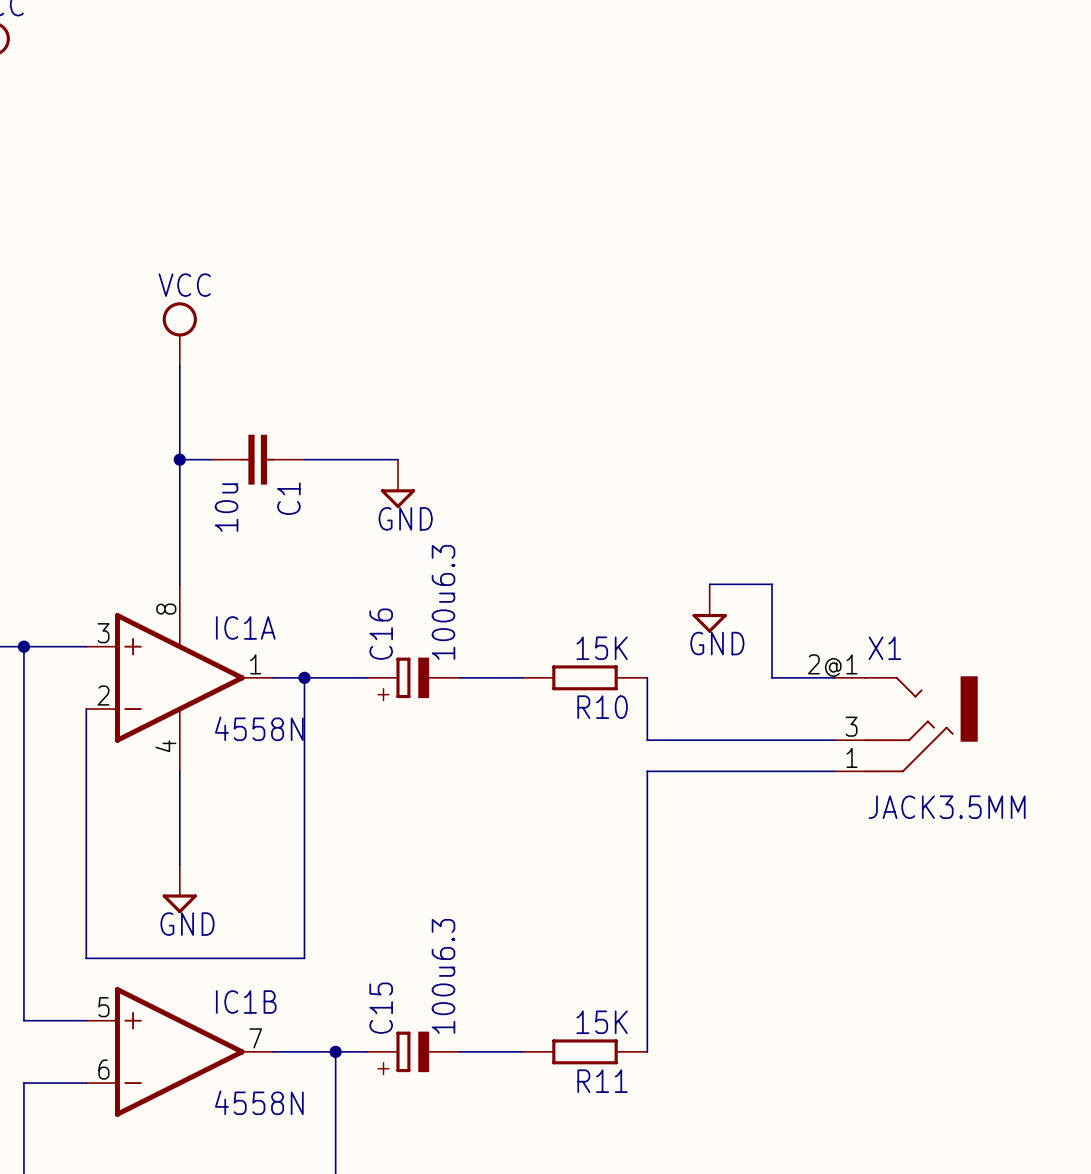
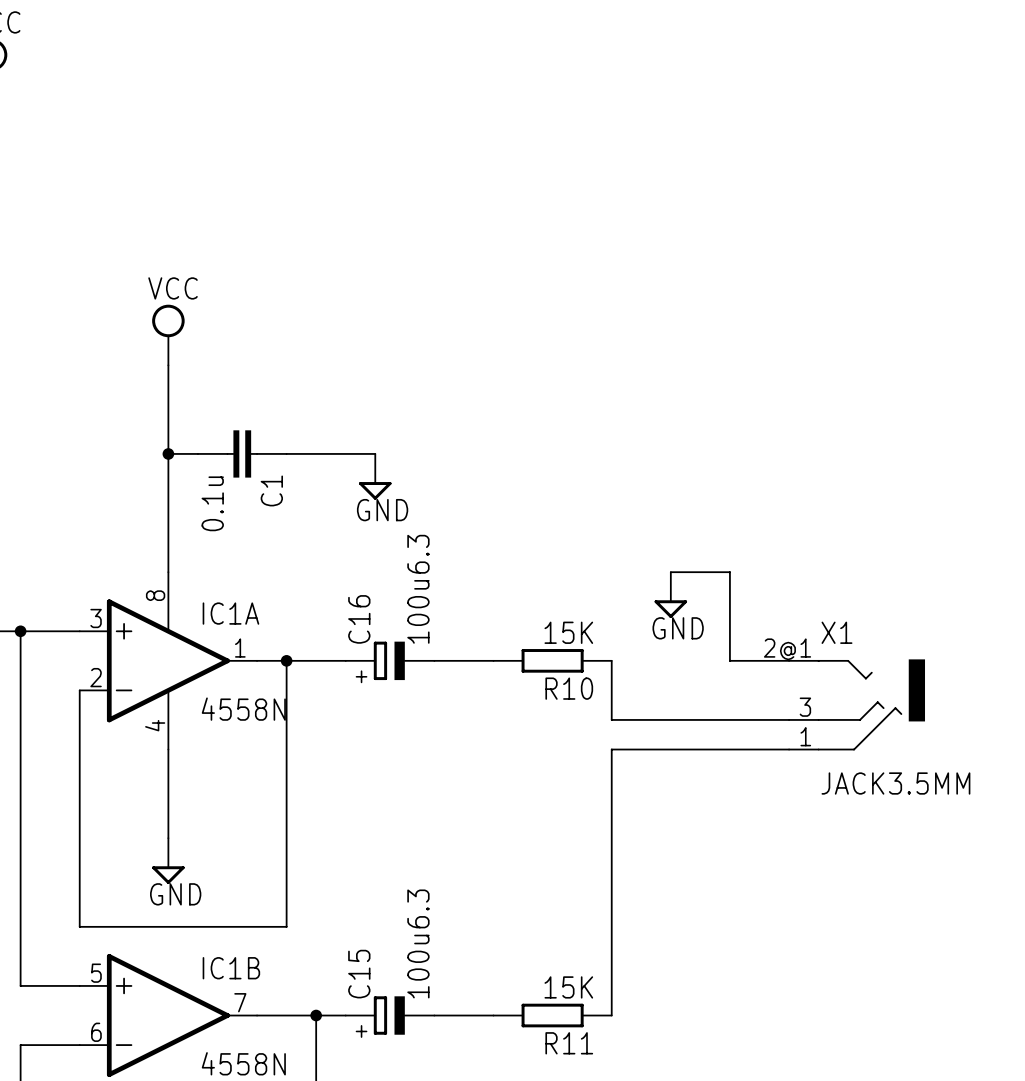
C1 value: 10u (226, 507) -> 0.1u (212, 503)

